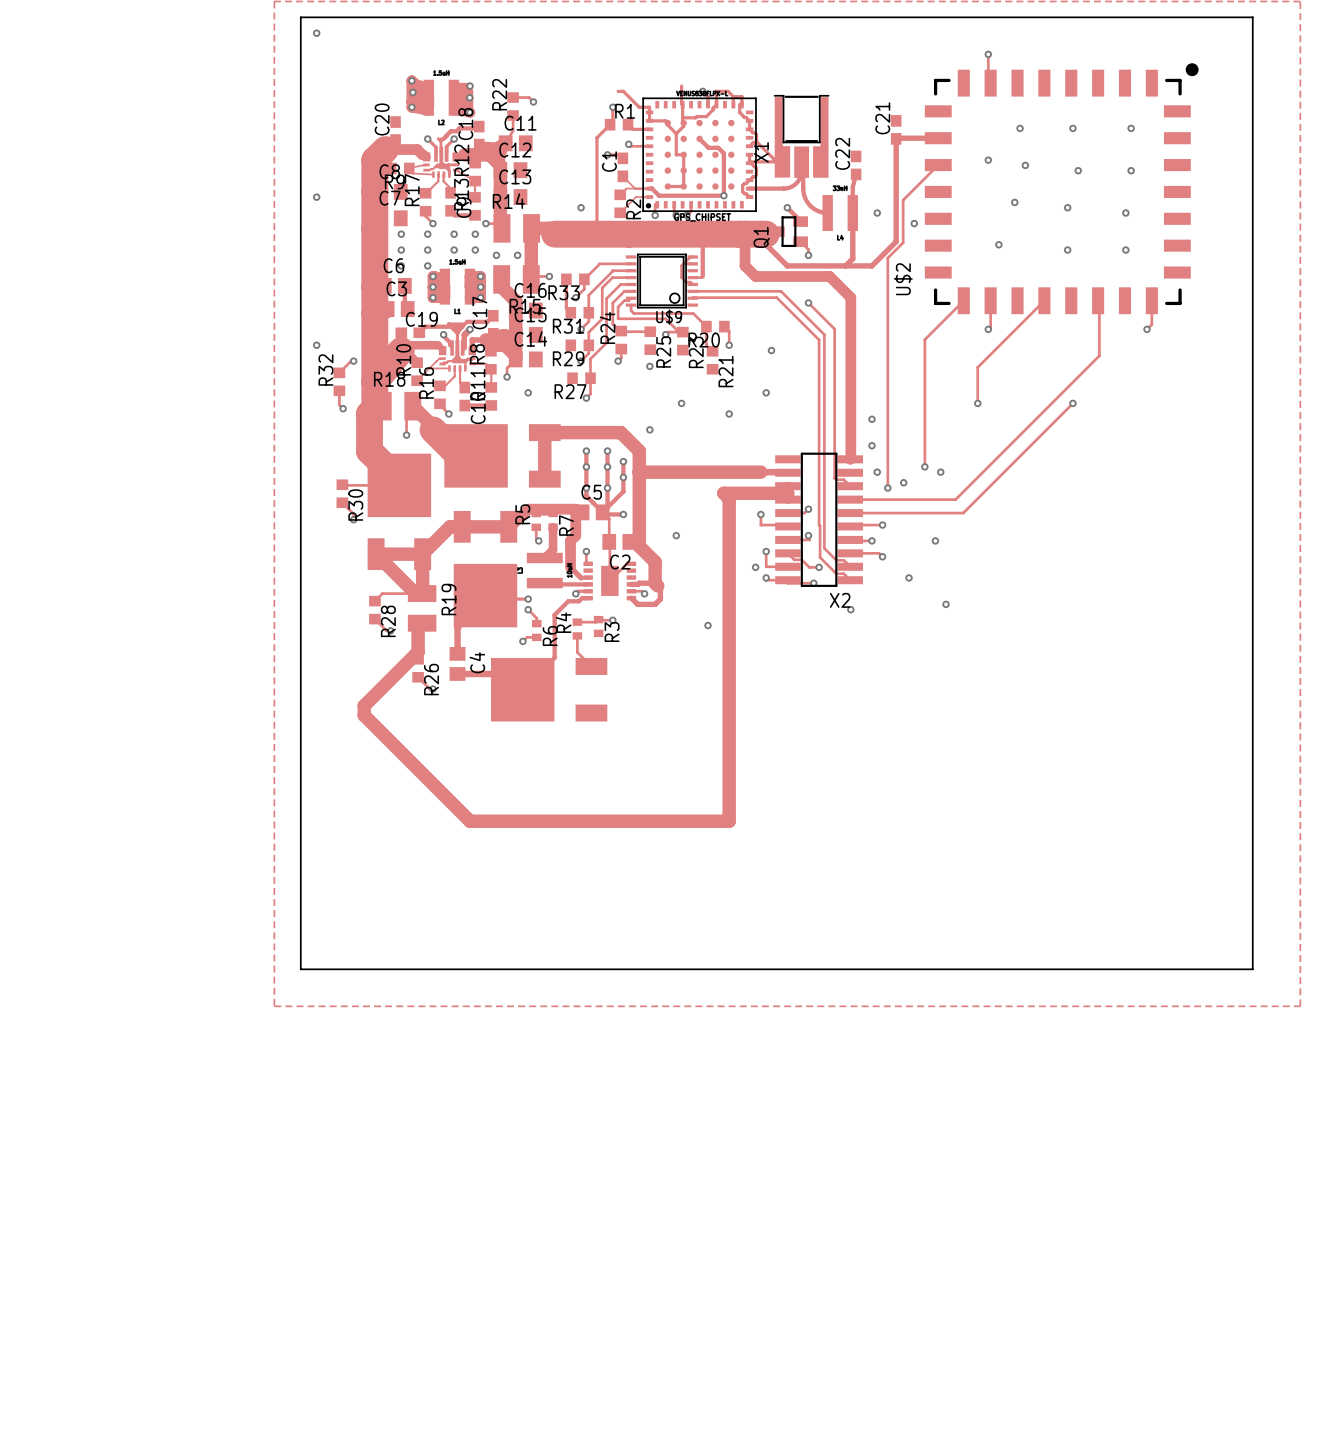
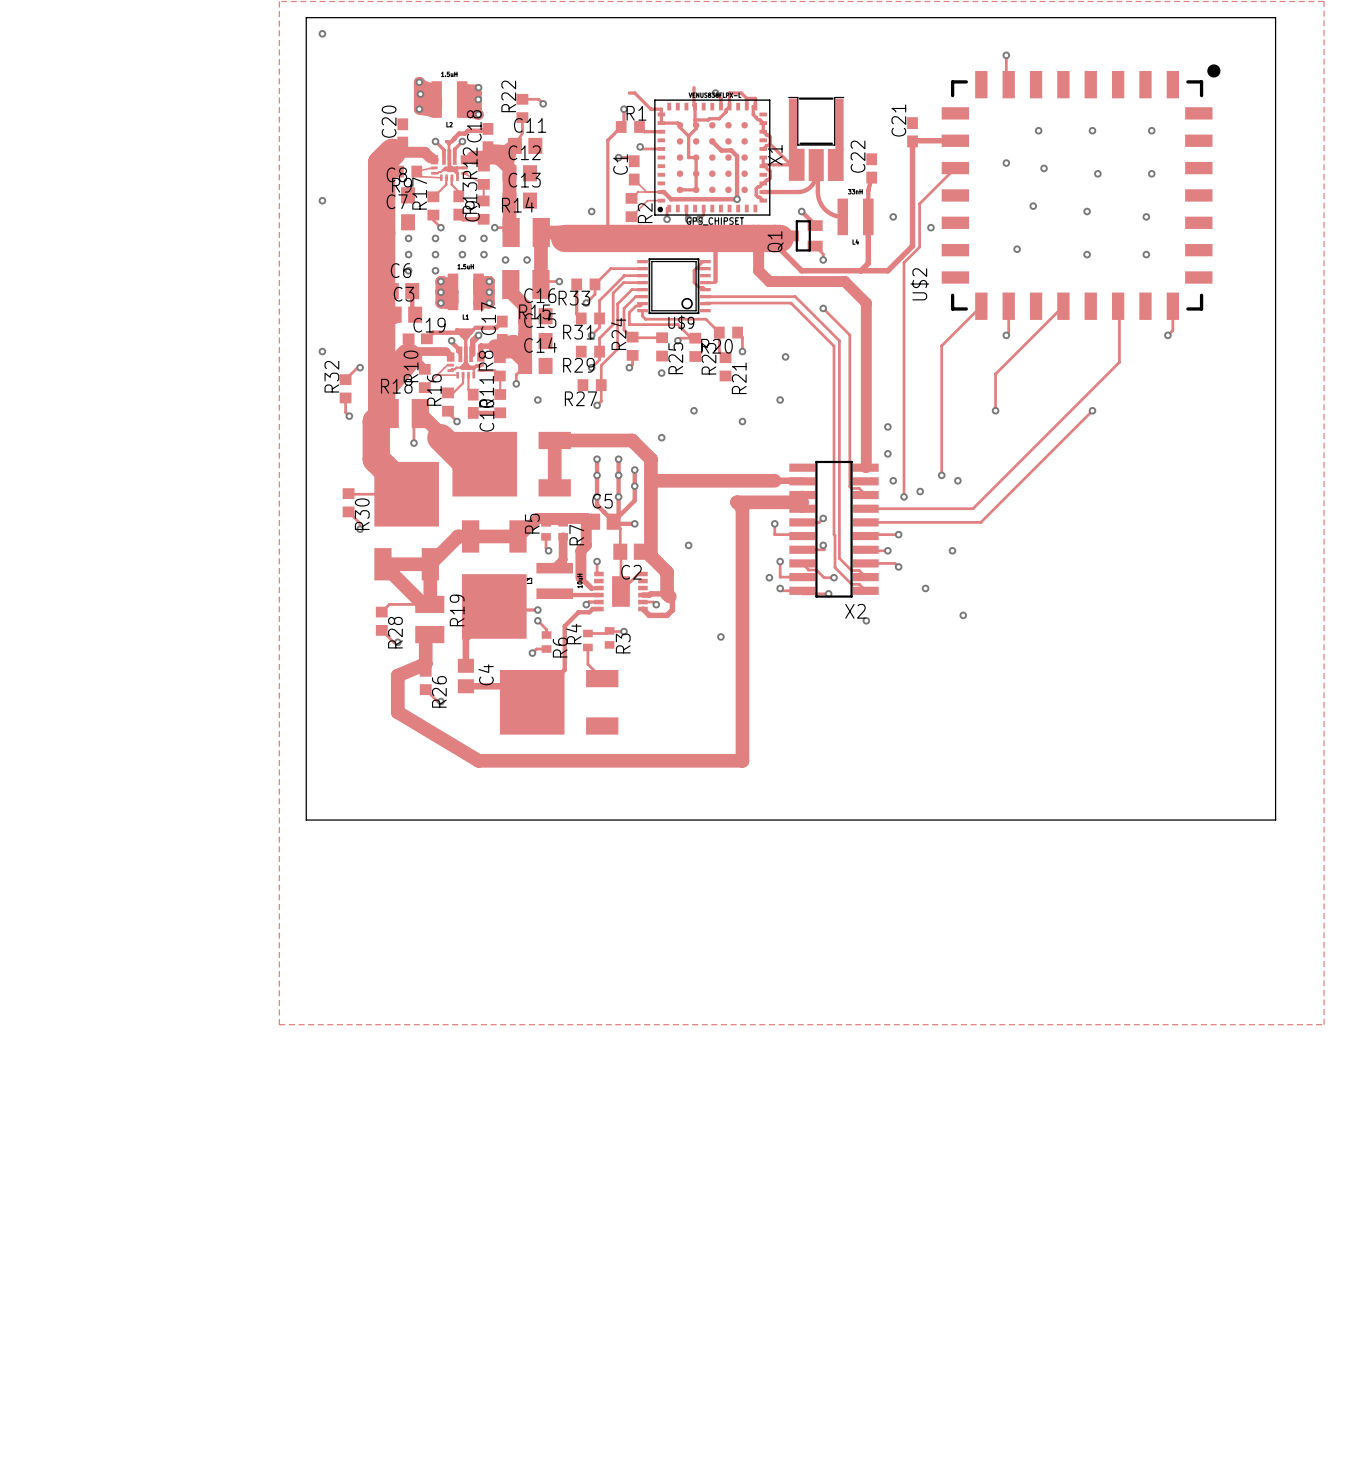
track: (418, 651) (364, 705) (364, 715) (470, 821) (729, 821) (729, 747) -> (425, 663) (397, 675) (397, 712) (478, 760) (742, 760)
board edge: (300, 805) (300, 969) (1252, 969) (1252, 805) -> (306, 820) (1275, 820)

